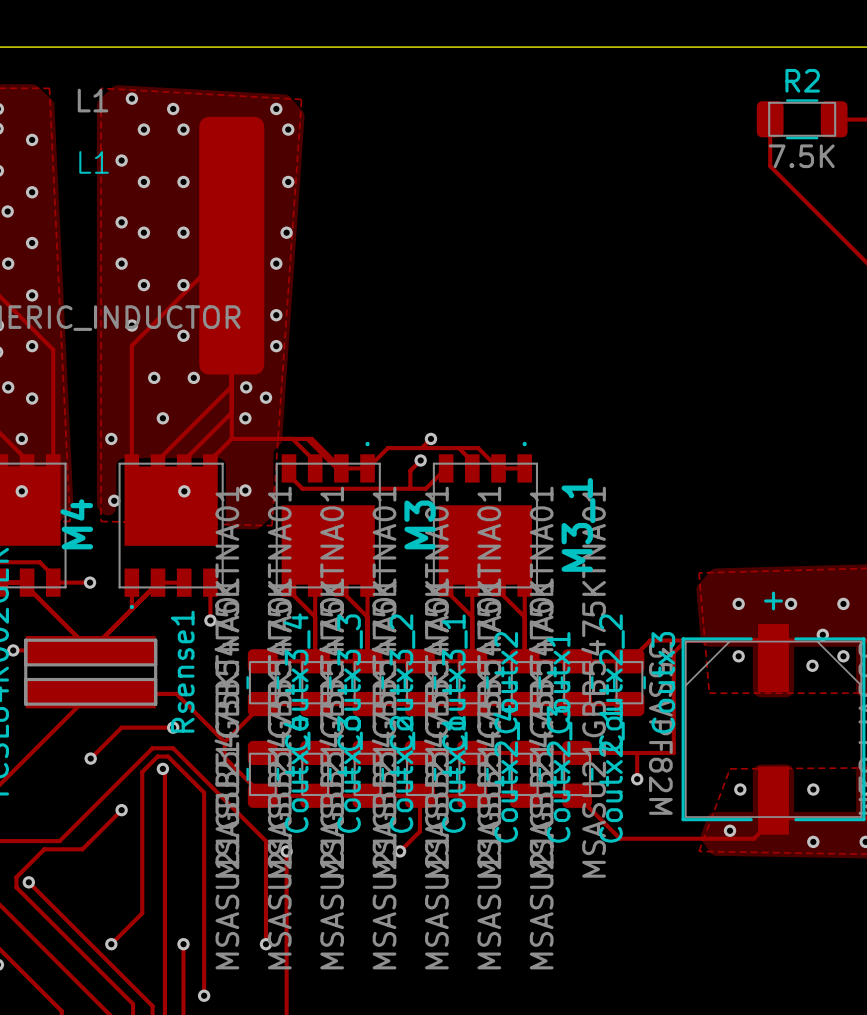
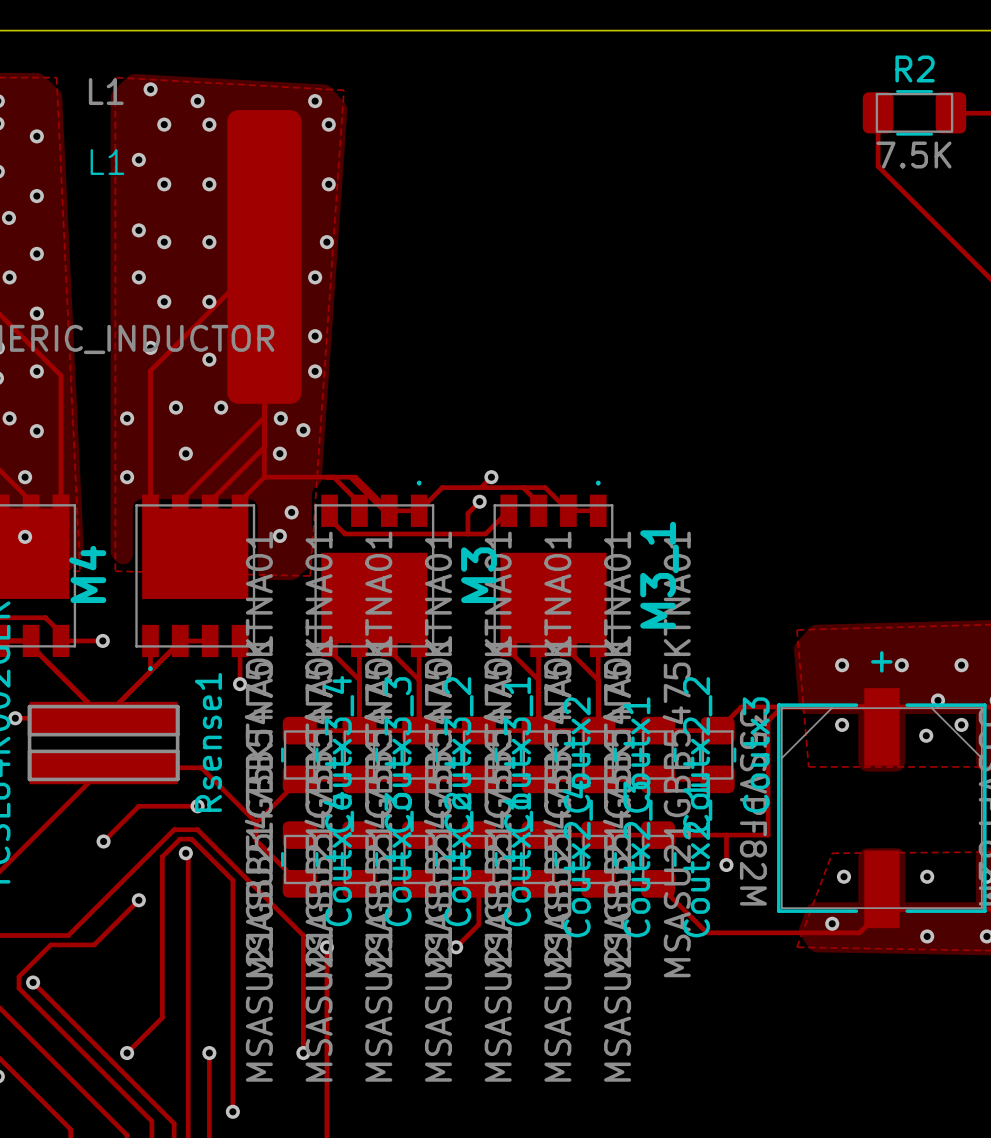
via: none -> (127, 418)
via: none -> (291, 512)
via: (184, 491) -> none
via: (114, 500) -> none

